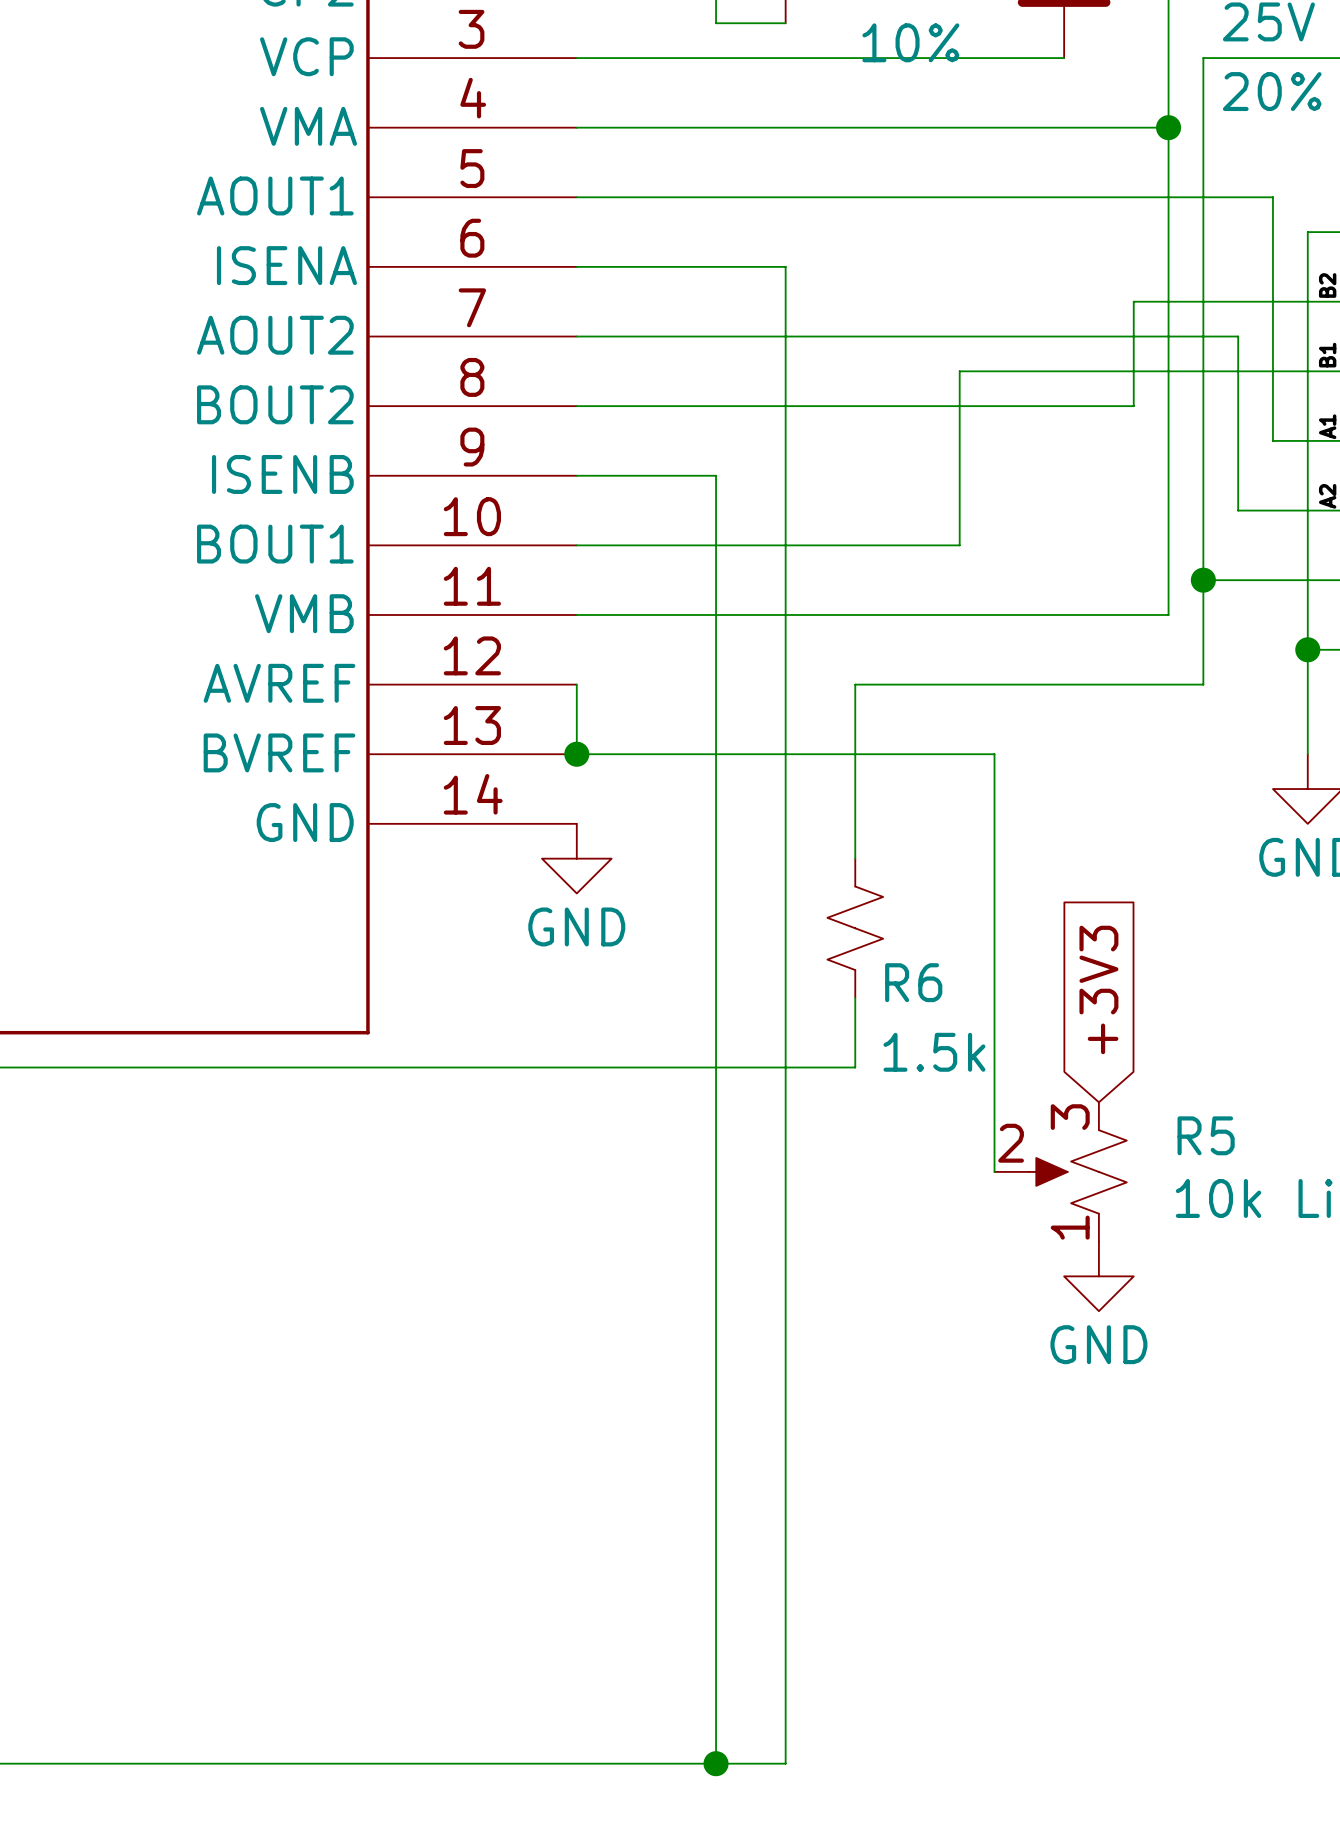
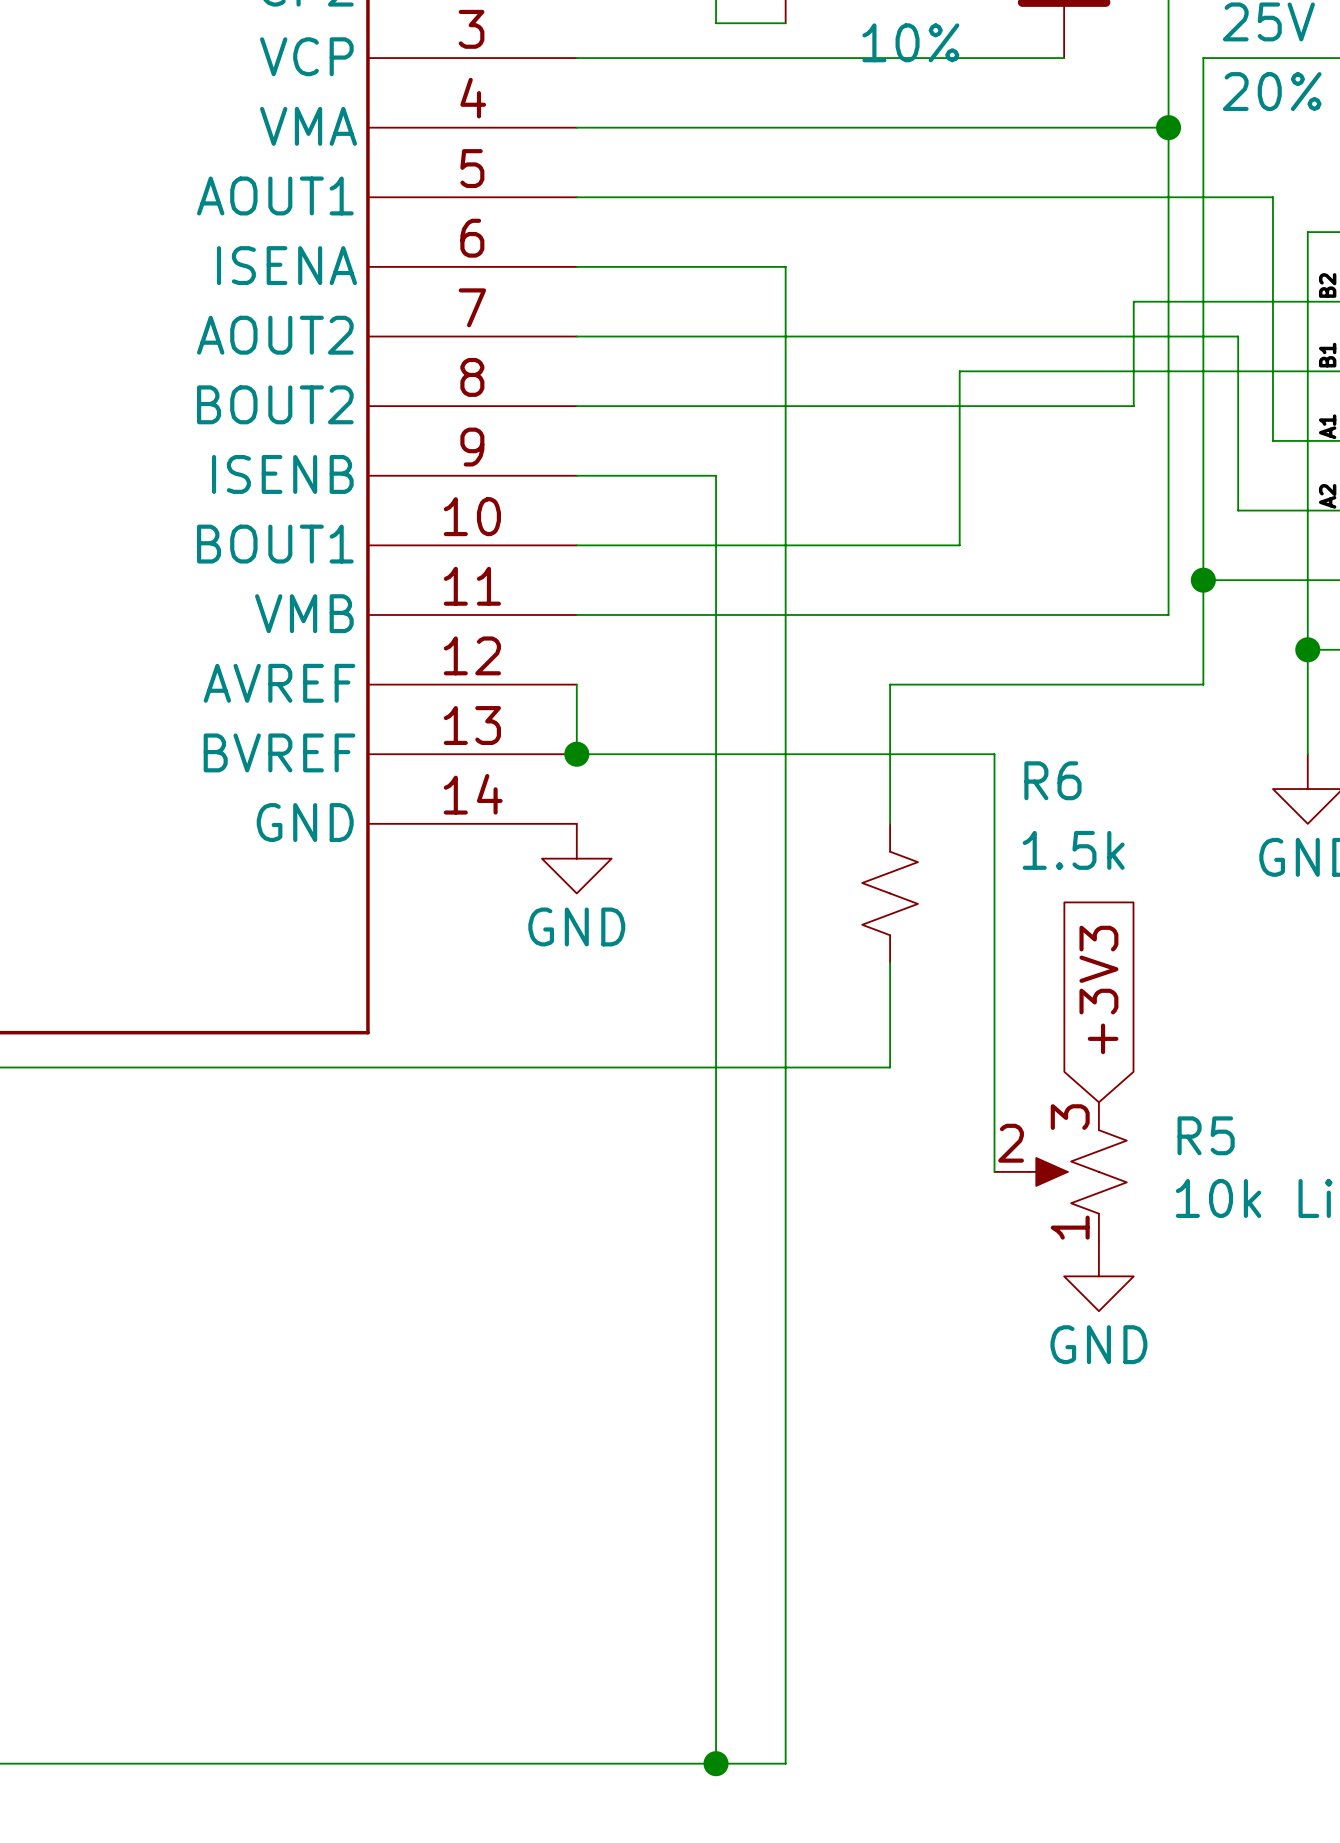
wire: (890, 684) (855, 684) (855, 858) -> (890, 684) (890, 823)
R6 position: (855, 928) -> (890, 893)
R6 name position: R6 (913, 982) -> R6 (1052, 780)
wire: (855, 997) (855, 1067) -> (890, 963) (890, 1067) (855, 1067)
R6 value position: 1.5k (934, 1052) -> 1.5k (1073, 850)

